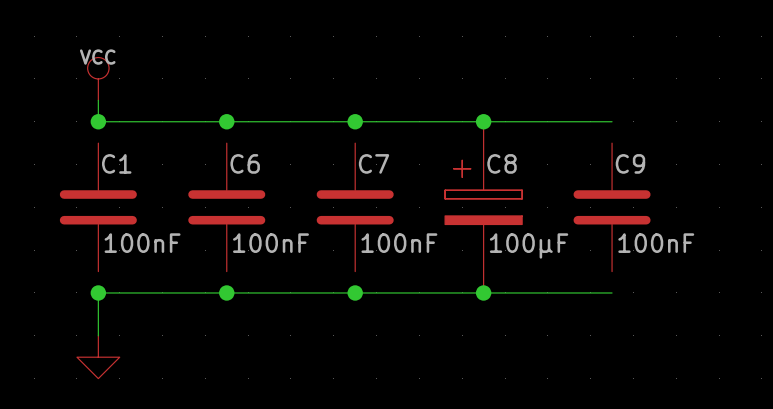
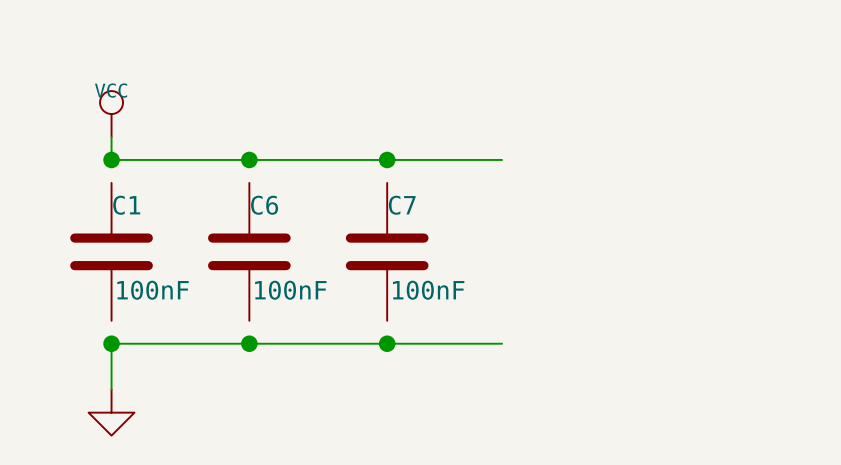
wire: (462, 121) (612, 121) -> none
junction: (483, 121) -> none
C8: 100µF (483, 207) -> none
C9: 100nF (612, 207) -> none
wire: (462, 292) (612, 292) -> none
junction: (483, 292) -> none

